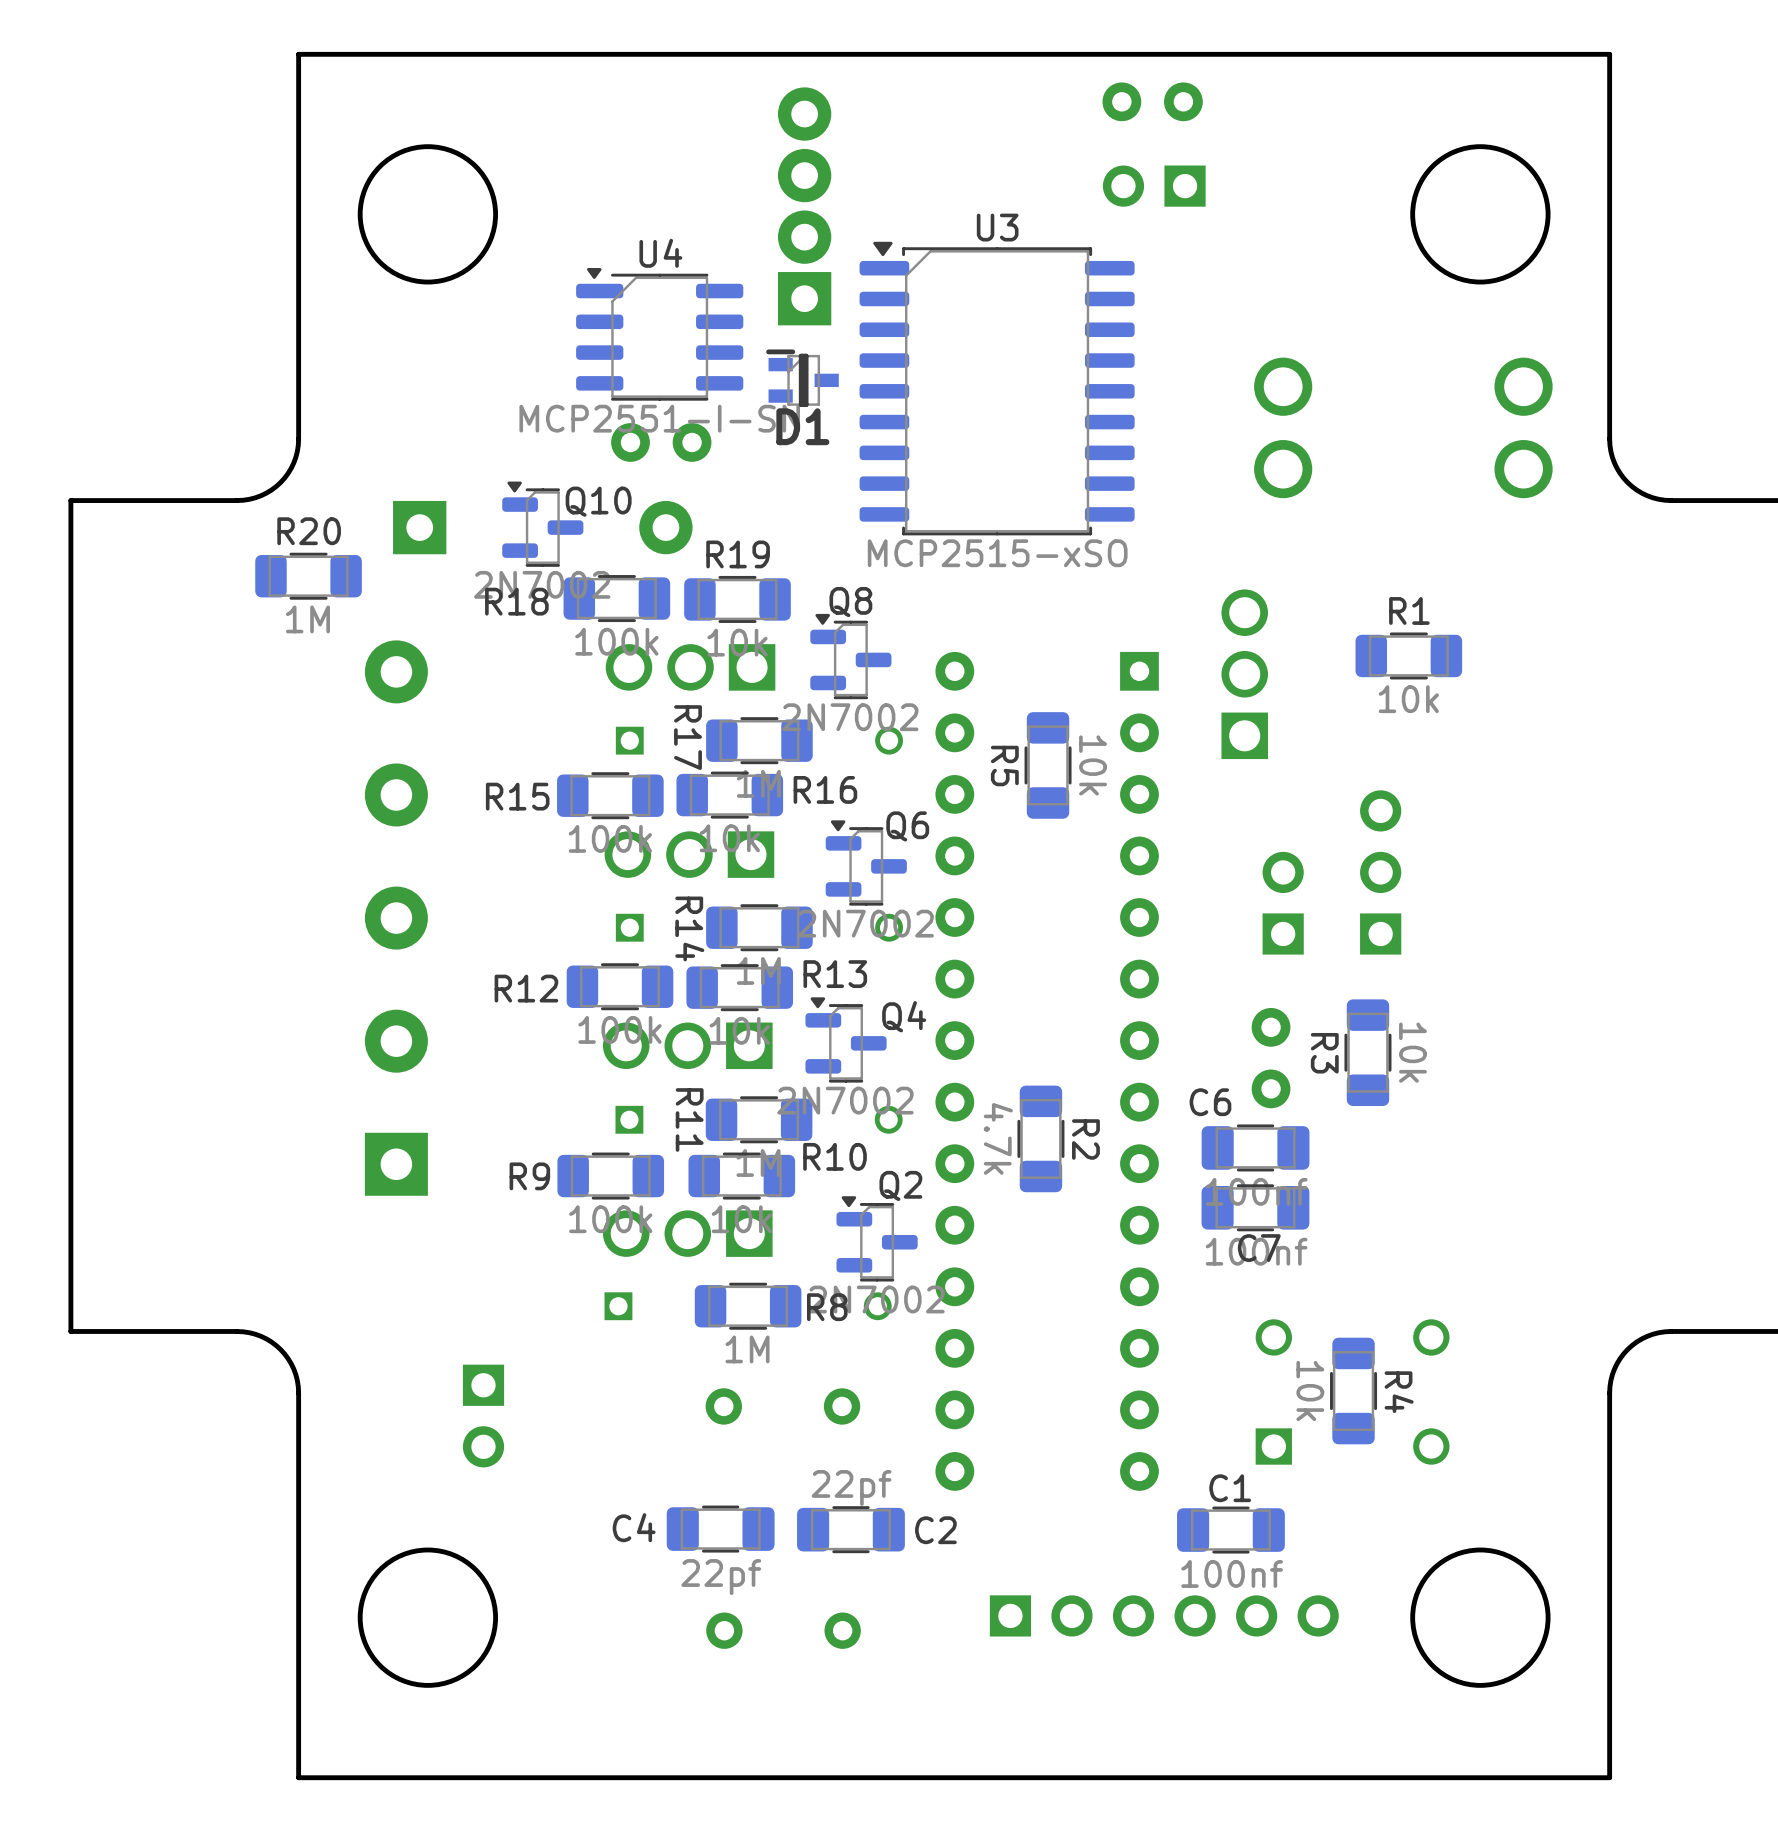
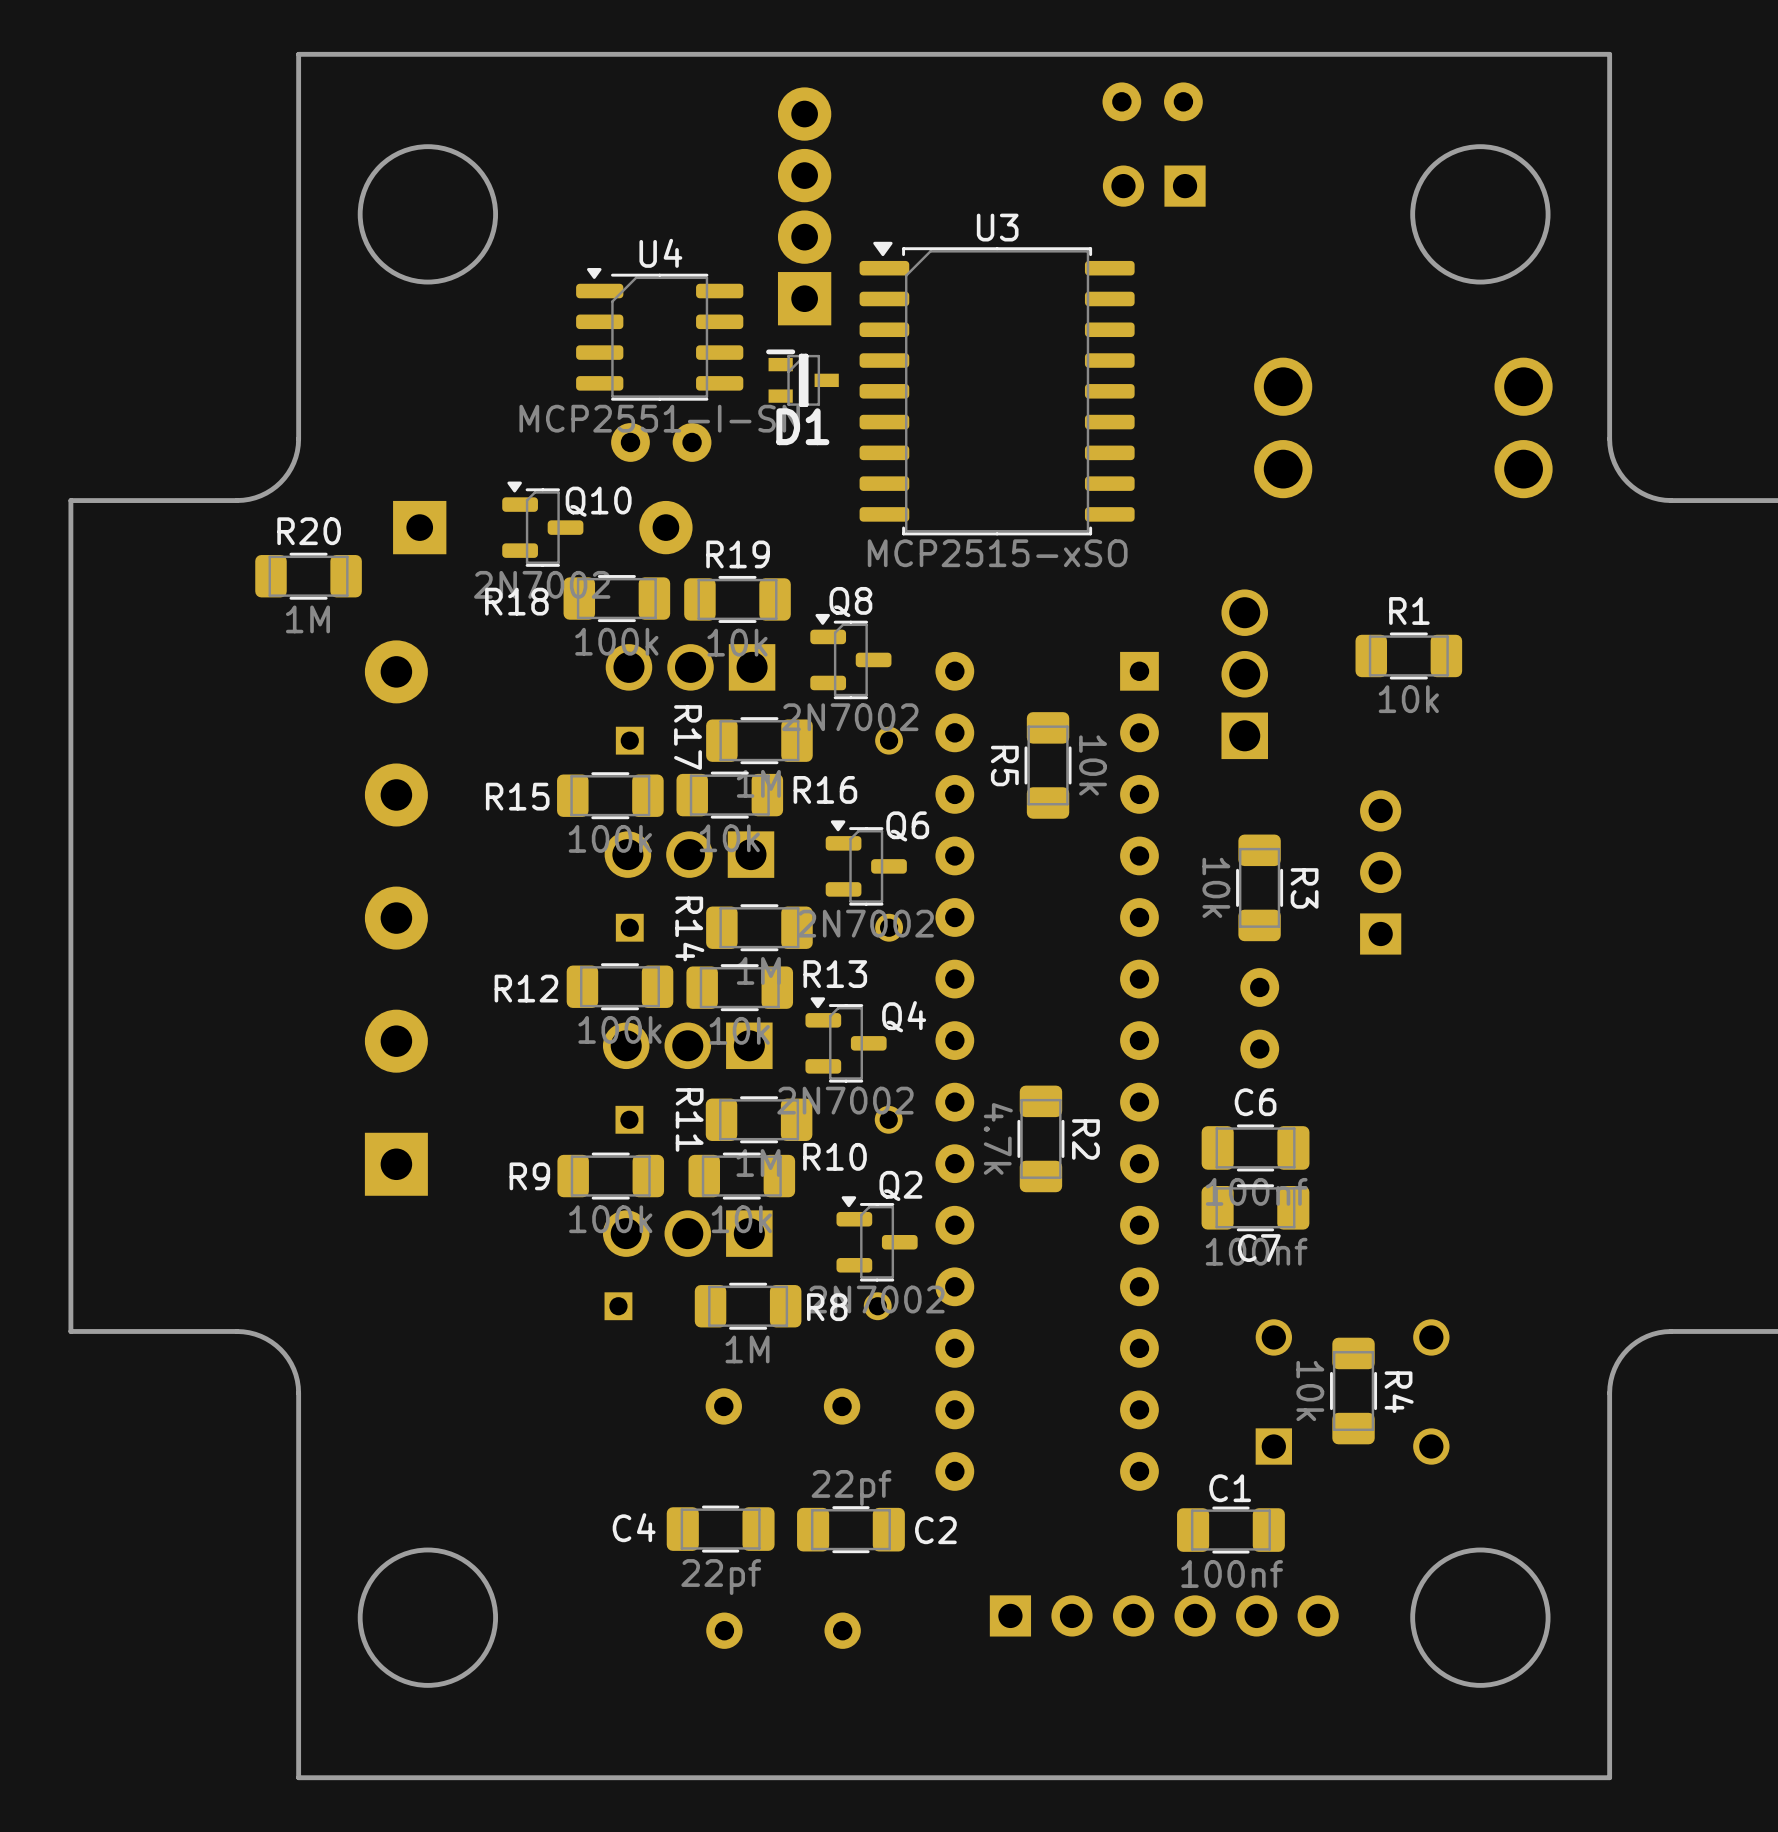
part: (1283, 903) -> none
R3 position: (1367, 1052) -> (1259, 887)
R3 value position: 10k (1412, 1052) -> 10k (1216, 887)
R3 name position: R3 (1324, 1053) -> R3 (1304, 888)
part position: (1271, 1058) -> (1259, 1018)
C6 name position: C6 (1210, 1102) -> C6 (1255, 1102)
part: (483, 1416) -> none

